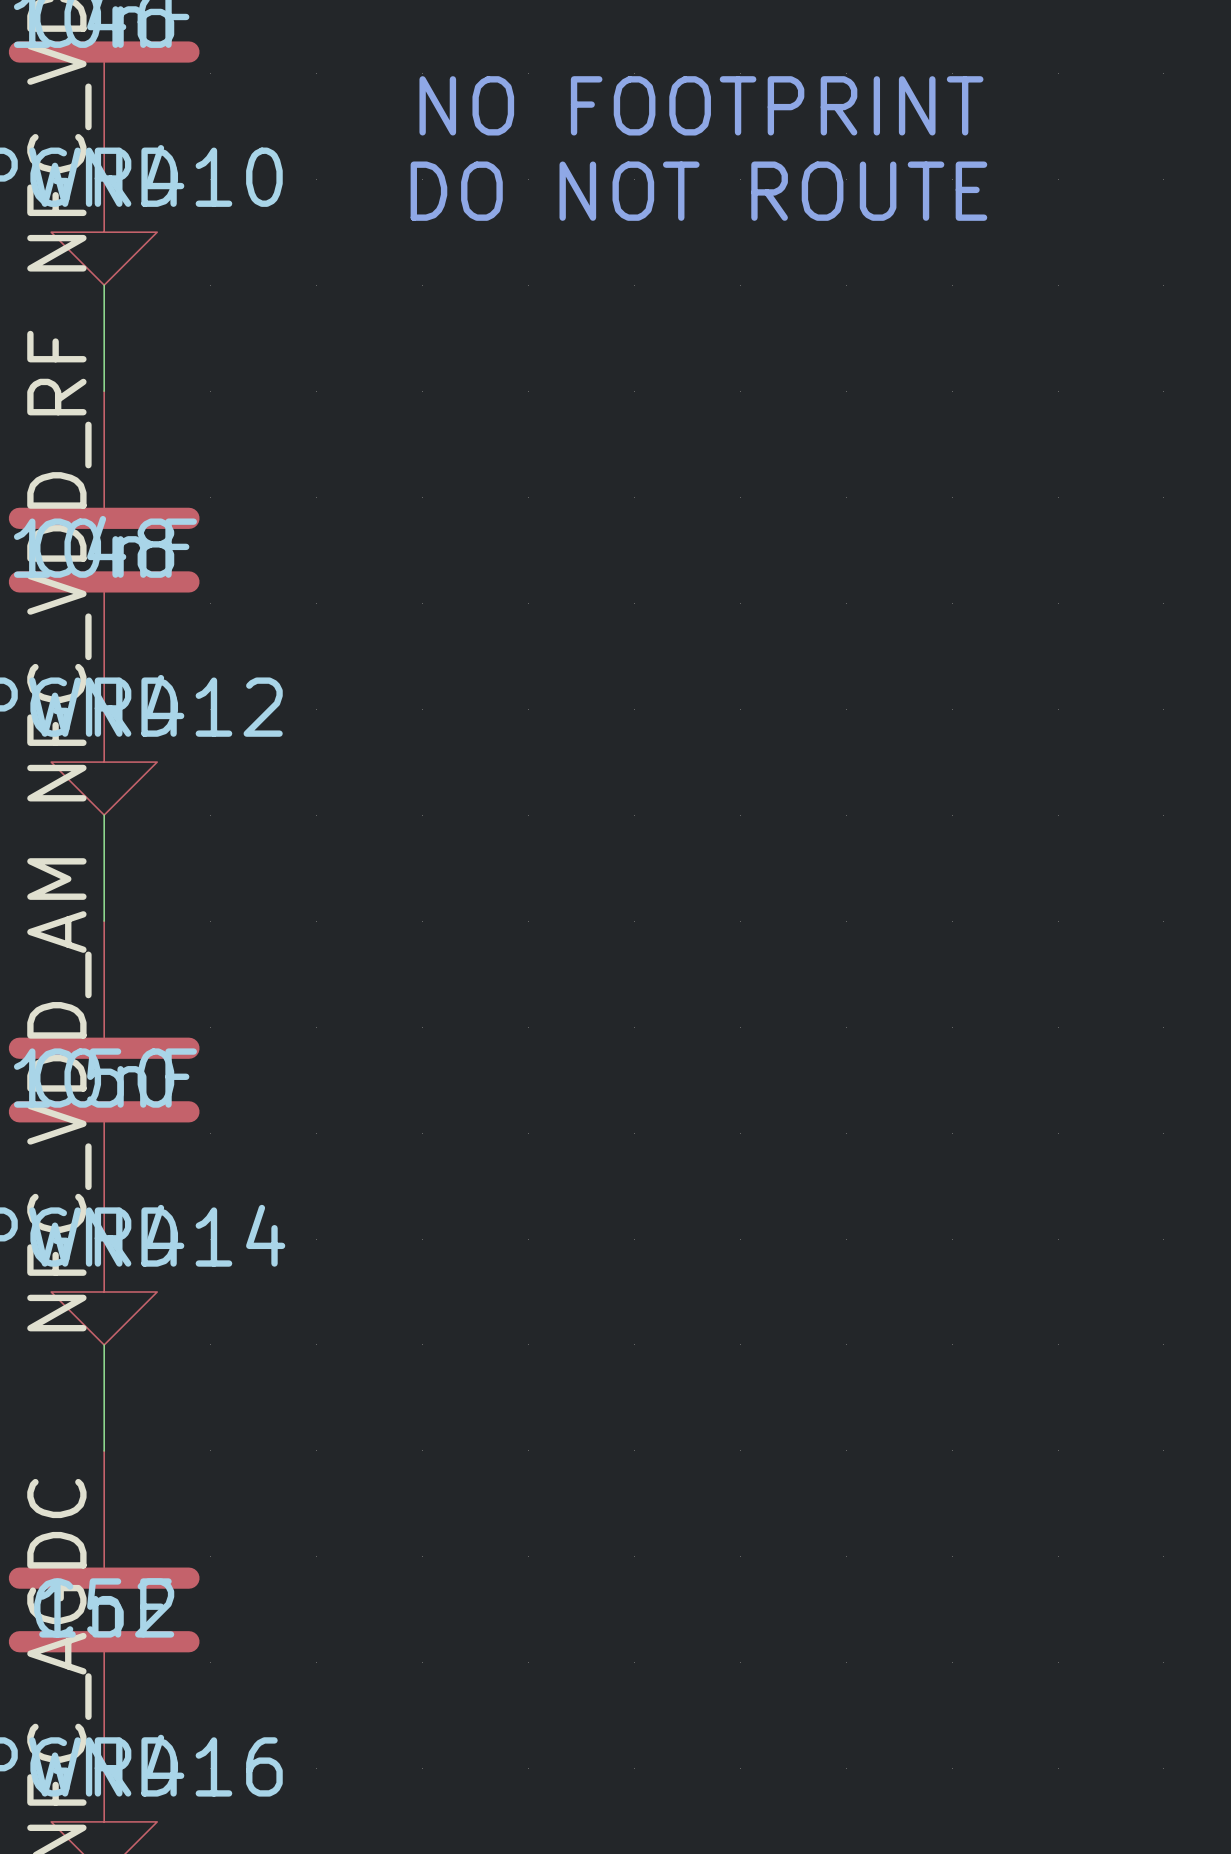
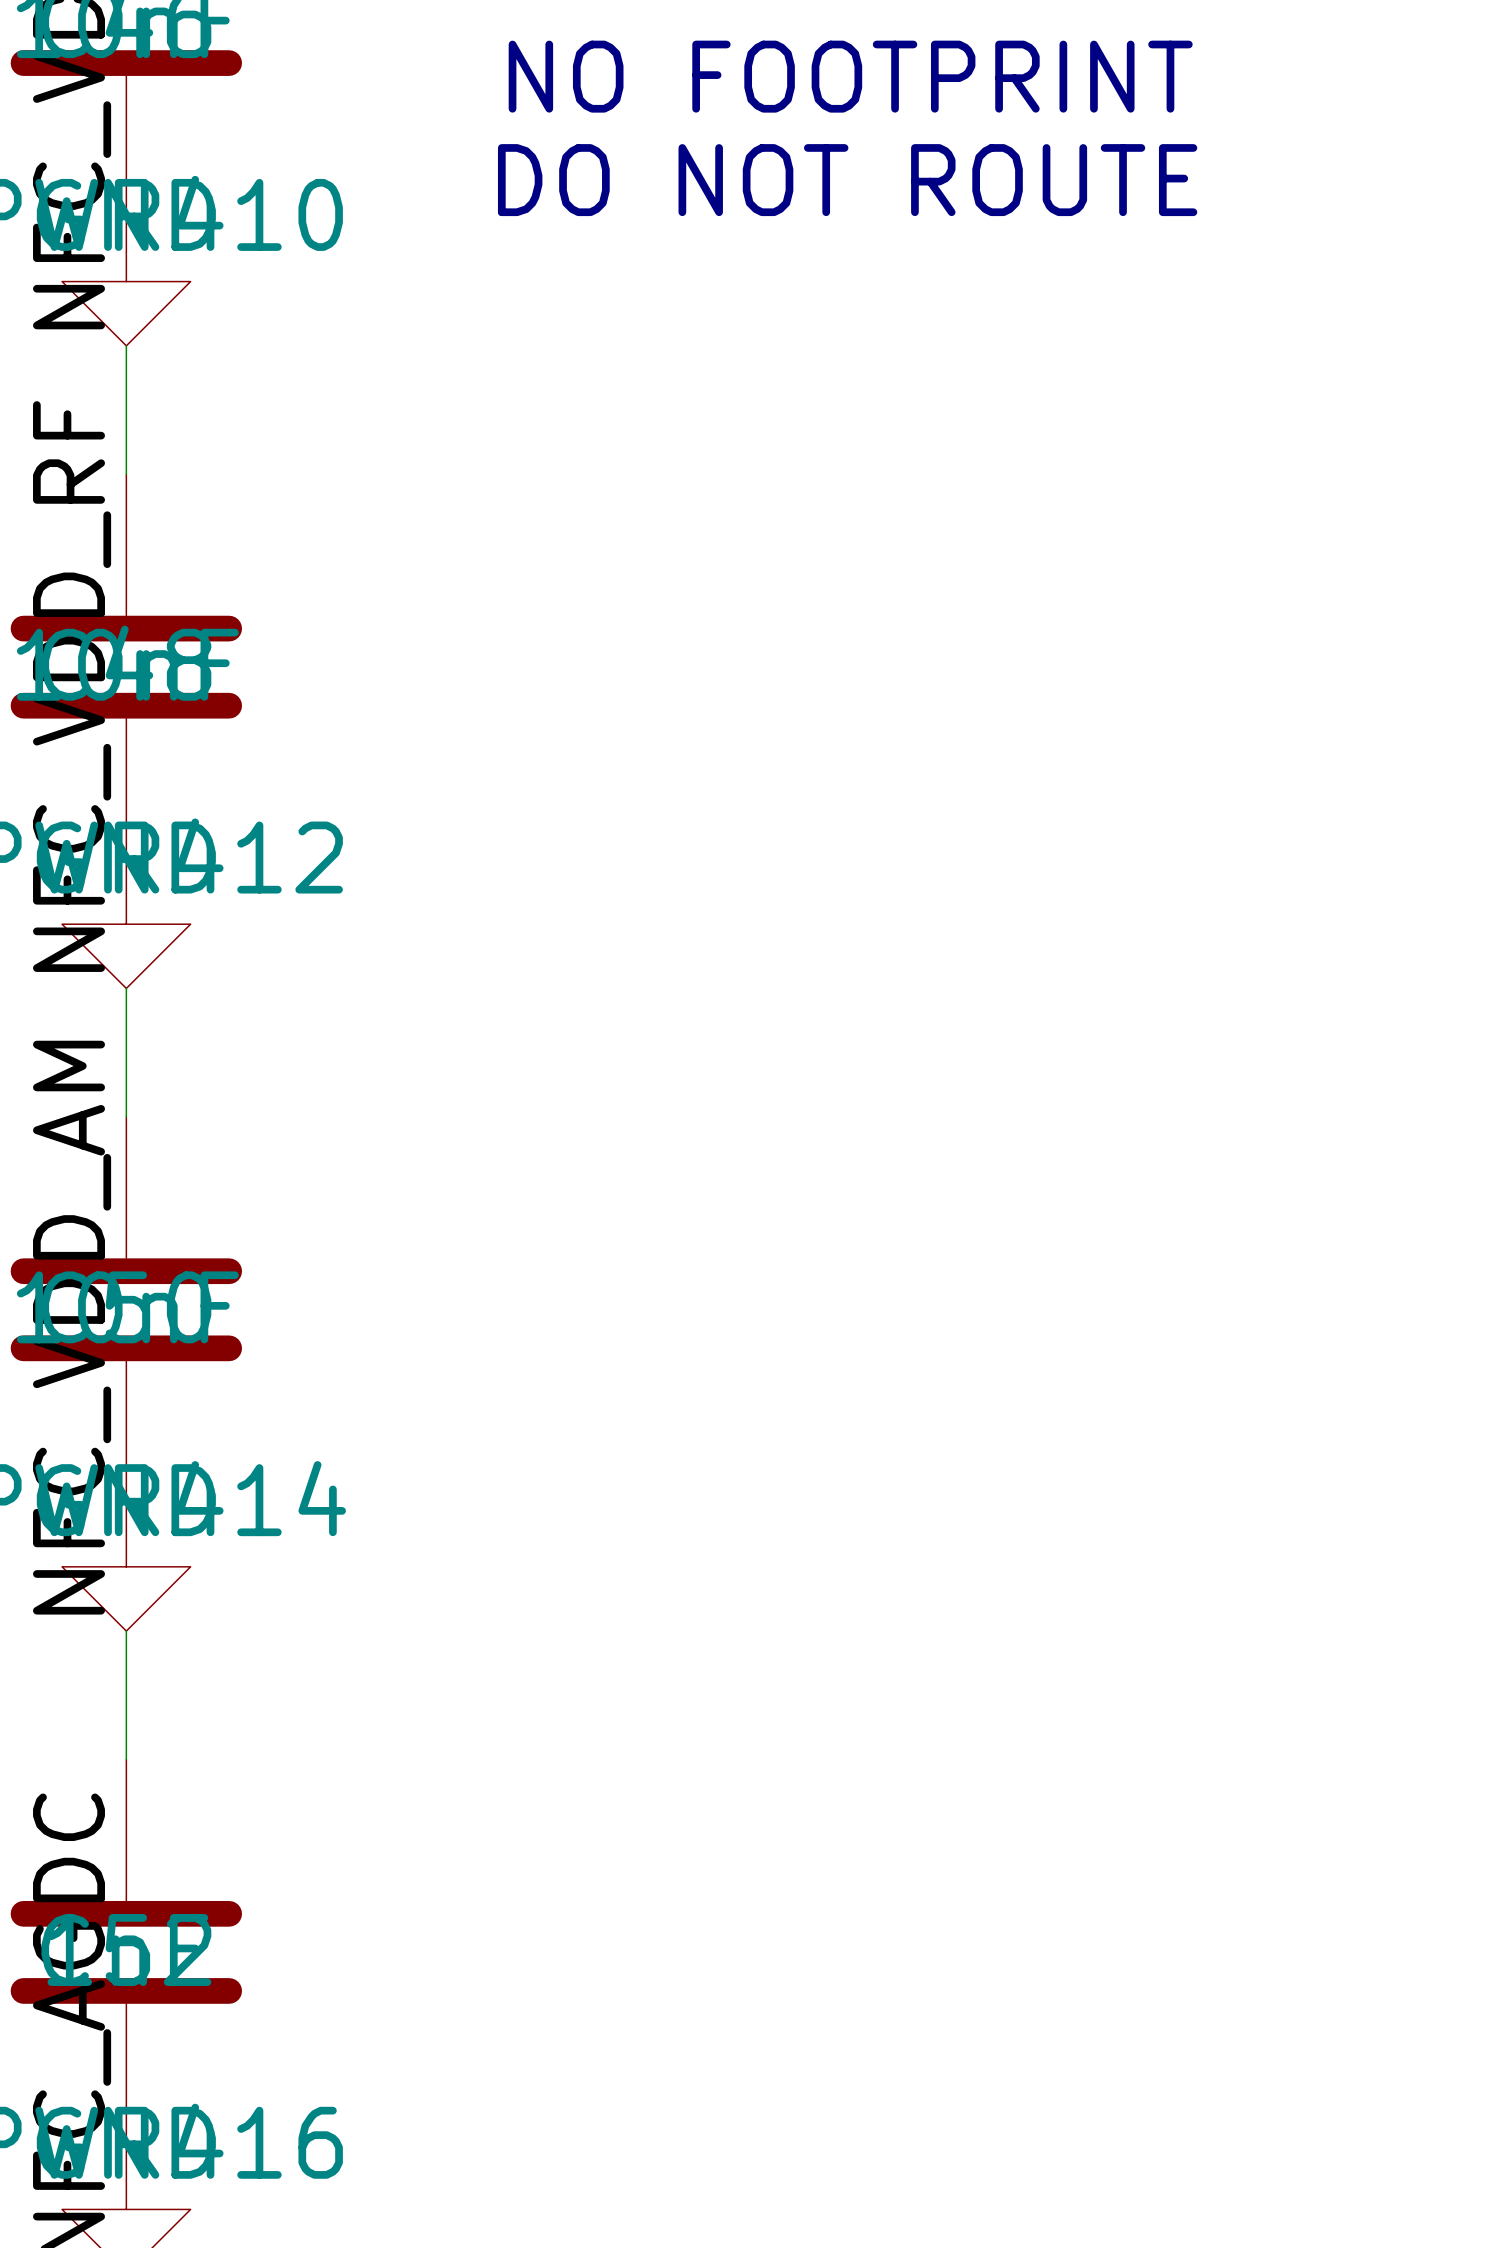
text position: NO FOOTPRINT (701, 105) -> NO FOOTPRINT (850, 76)
text position: DO NOT ROUTE (698, 191) -> DO NOT ROUTE (847, 180)

